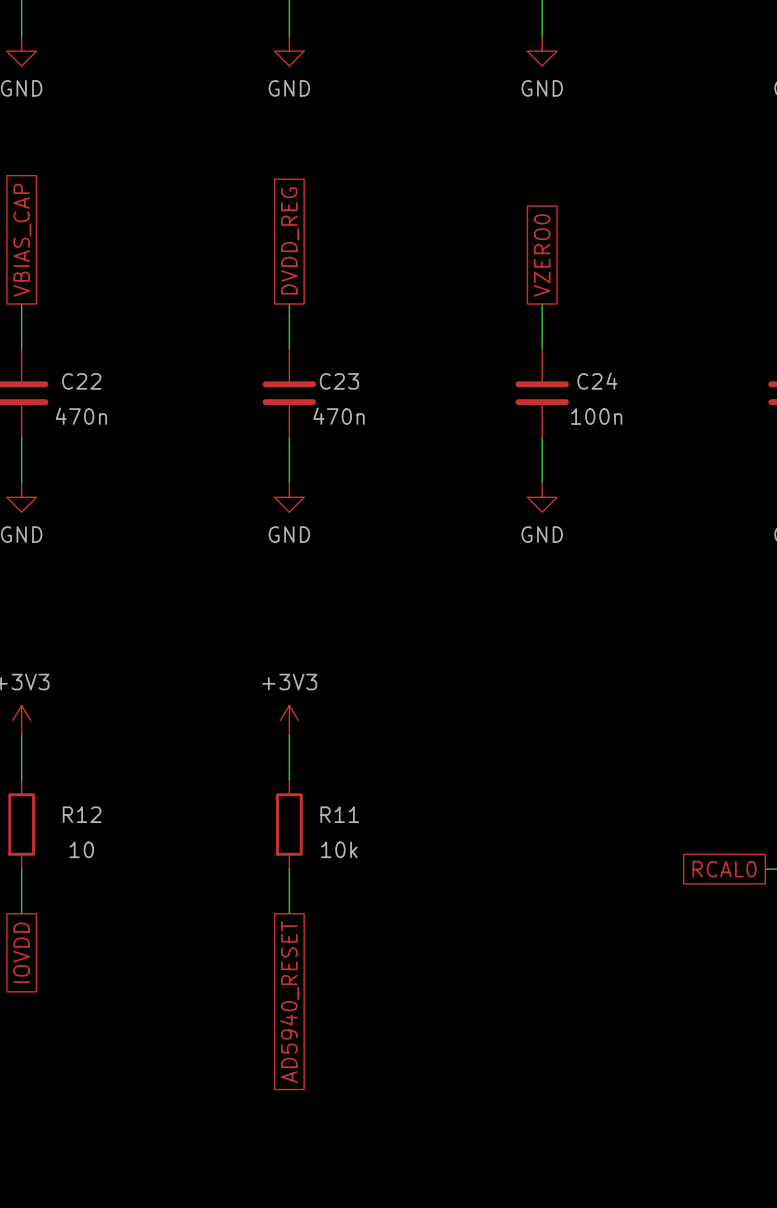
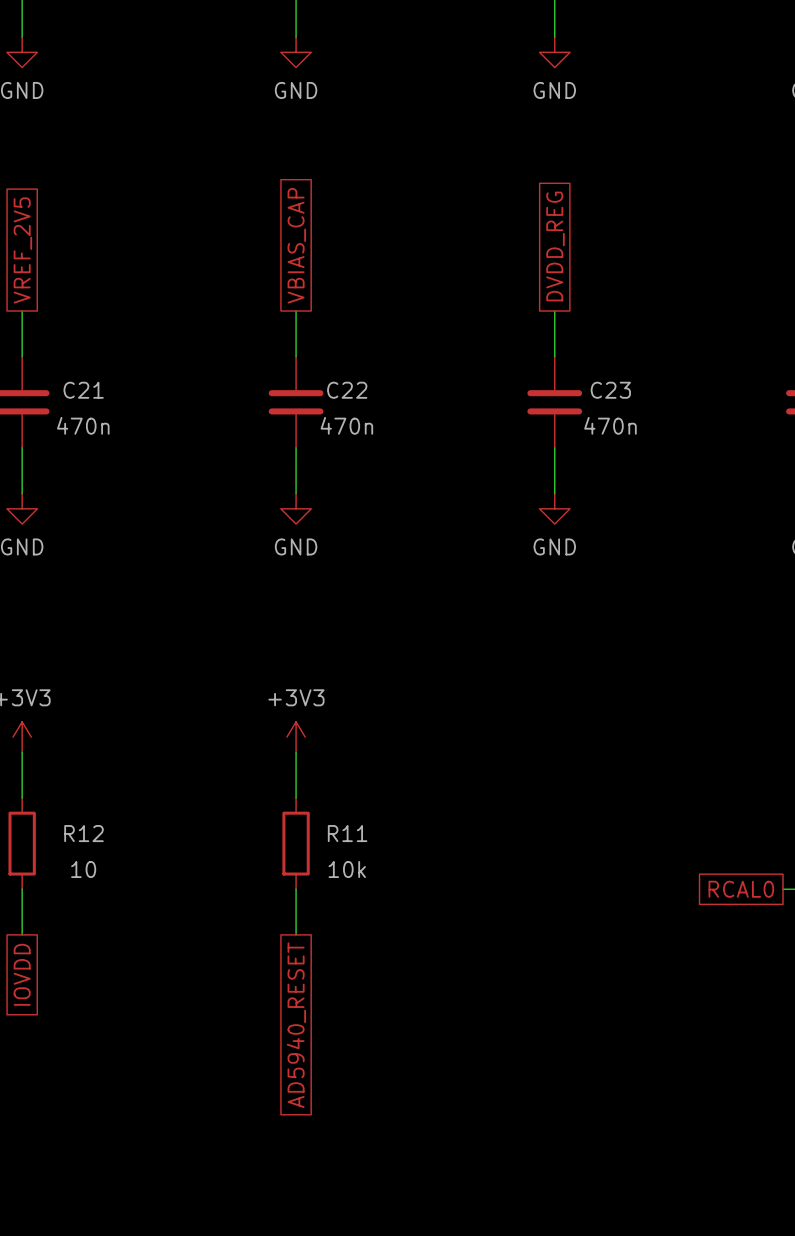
global label: VBIAS_CAP (22, 240) -> VREF_2V5 (22, 250)
global label: DVDD_REG (290, 240) -> VBIAS_CAP (296, 245)
global label: VZERO0 (542, 255) -> DVDD_REG (555, 246)
C22 name: C22 (81, 381) -> C21 (83, 390)
C23 name: C23 (339, 381) -> C22 (347, 390)
C24 name: C24 (597, 381) -> C23 (610, 390)
C24 value: 100n (596, 416) -> 470n (610, 425)

